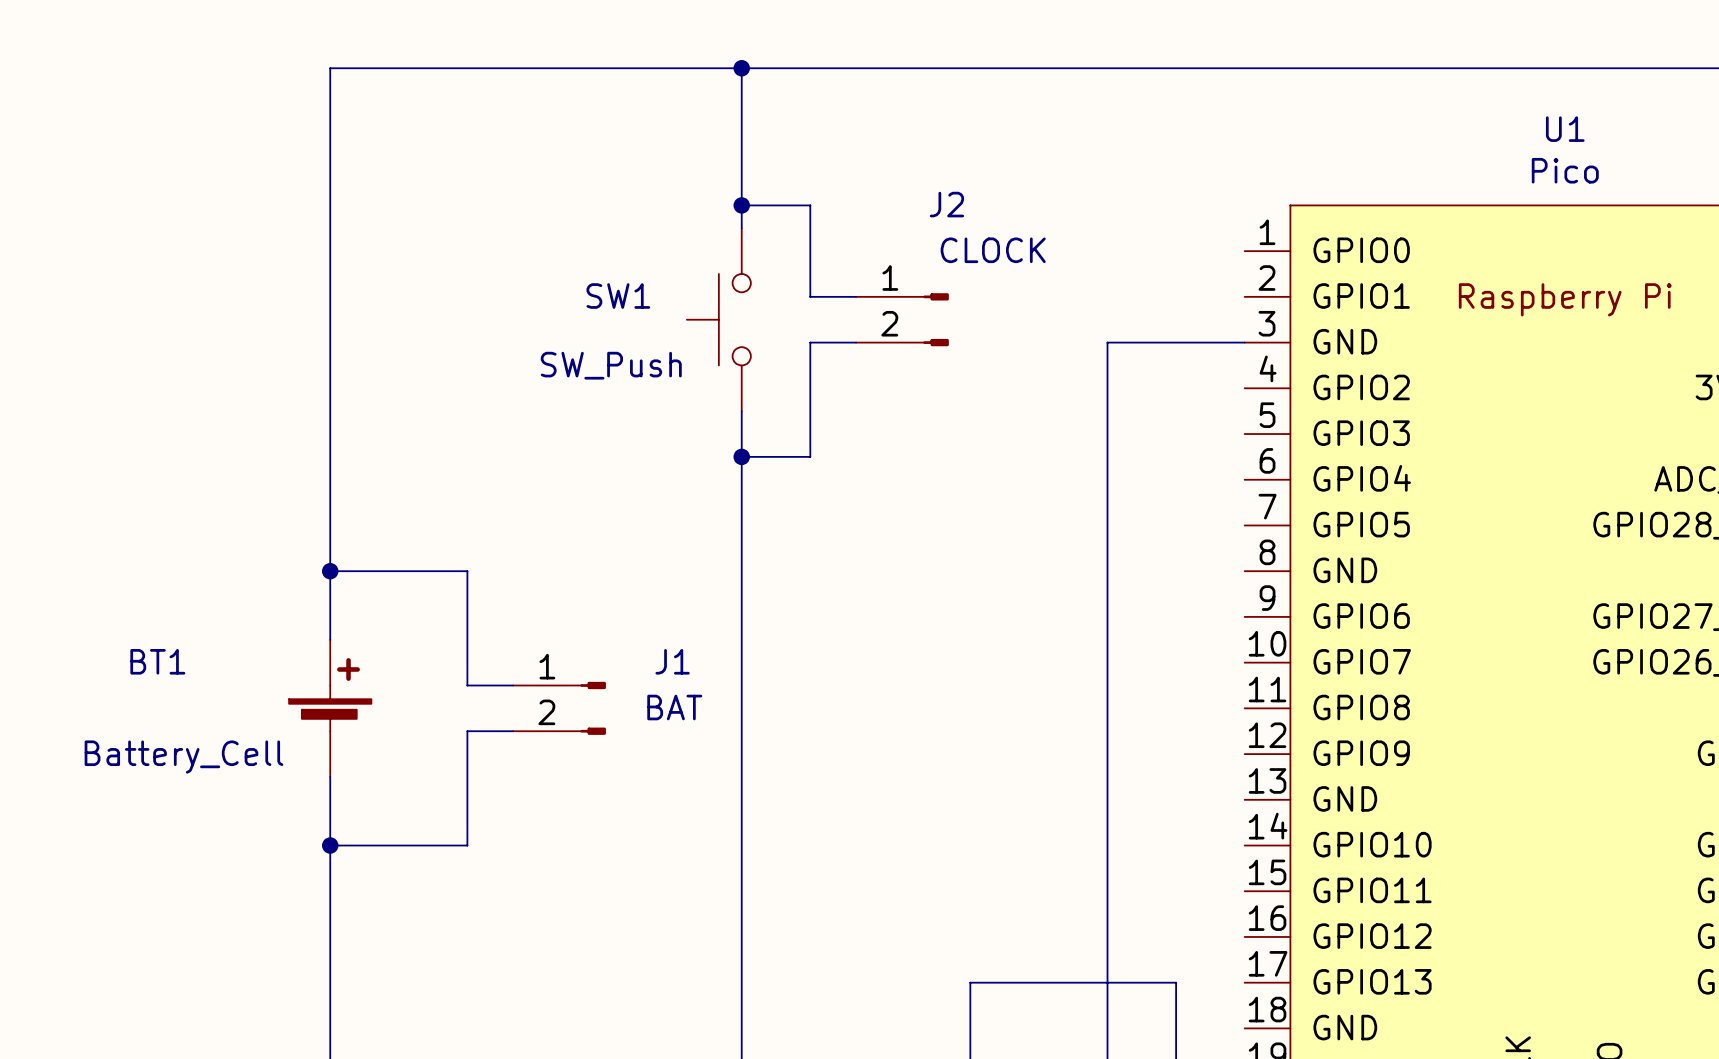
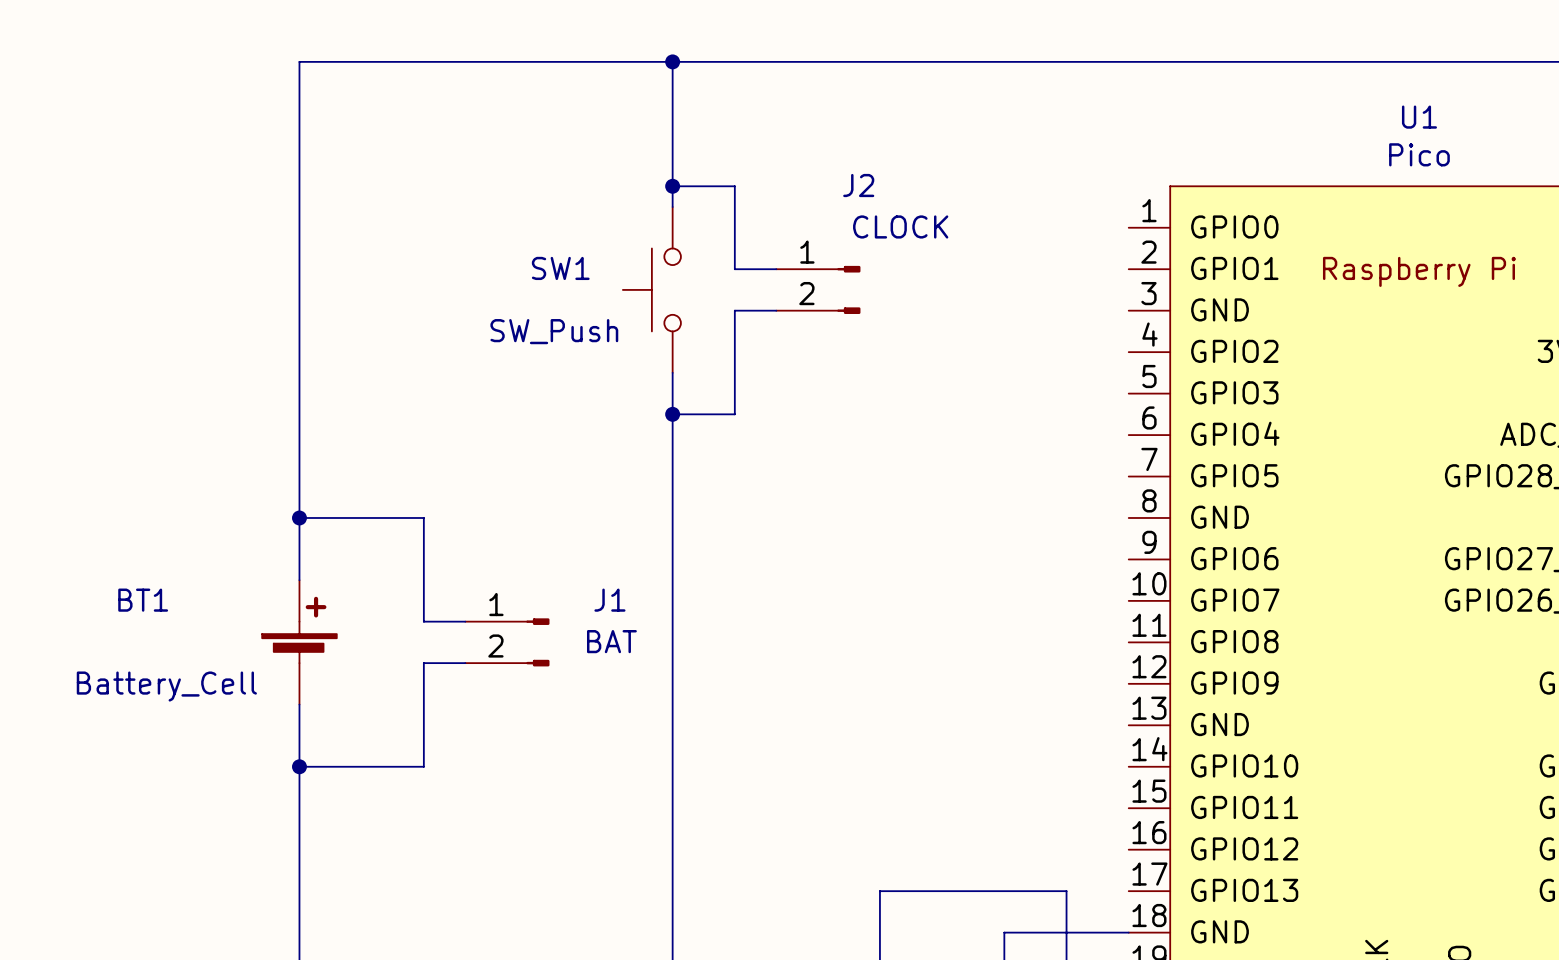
wire: (1244, 342) (1107, 342) (1107, 1028) -> (1128, 932) (1004, 932)

